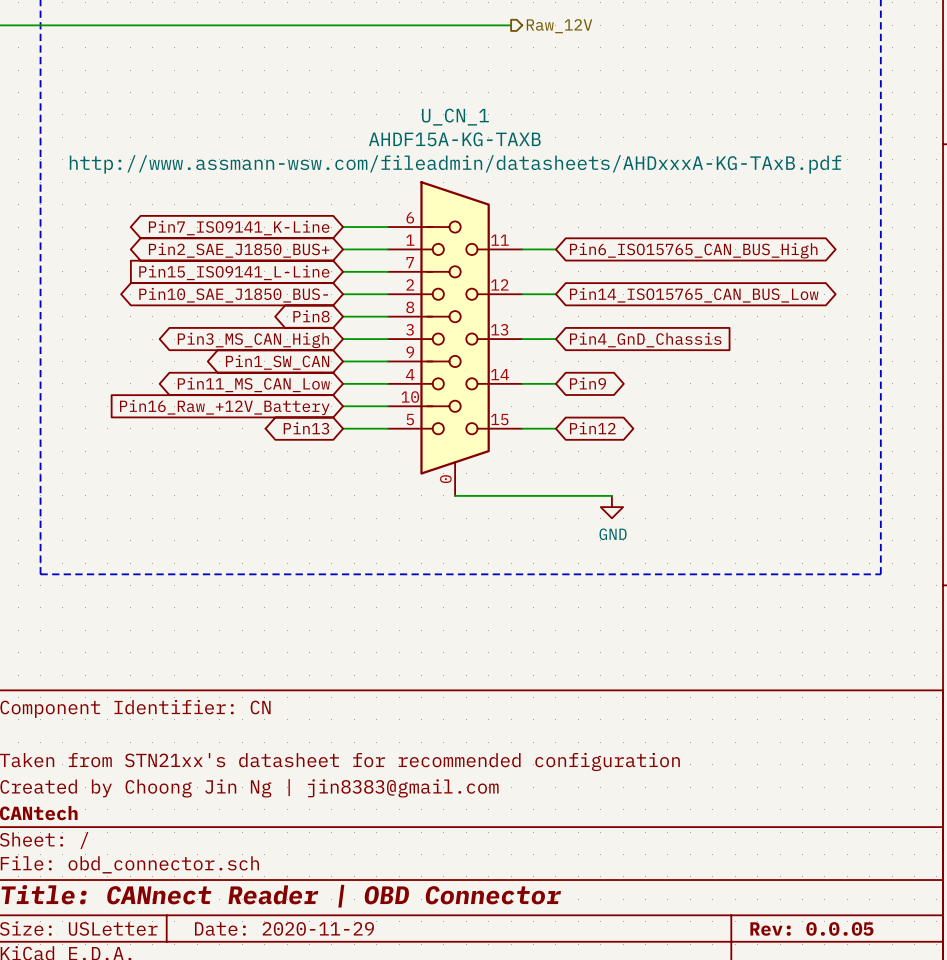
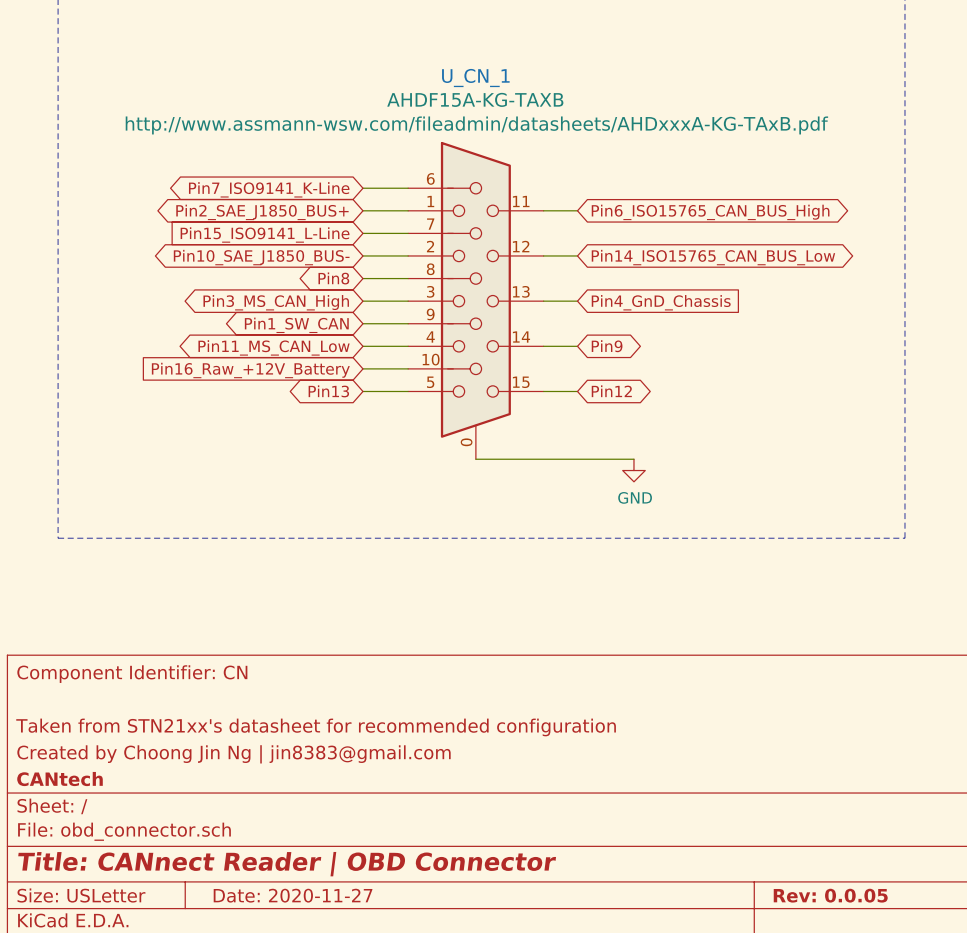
title block: Date: 2020-11-29 (284, 928) -> Date: 2020-11-27 (293, 895)

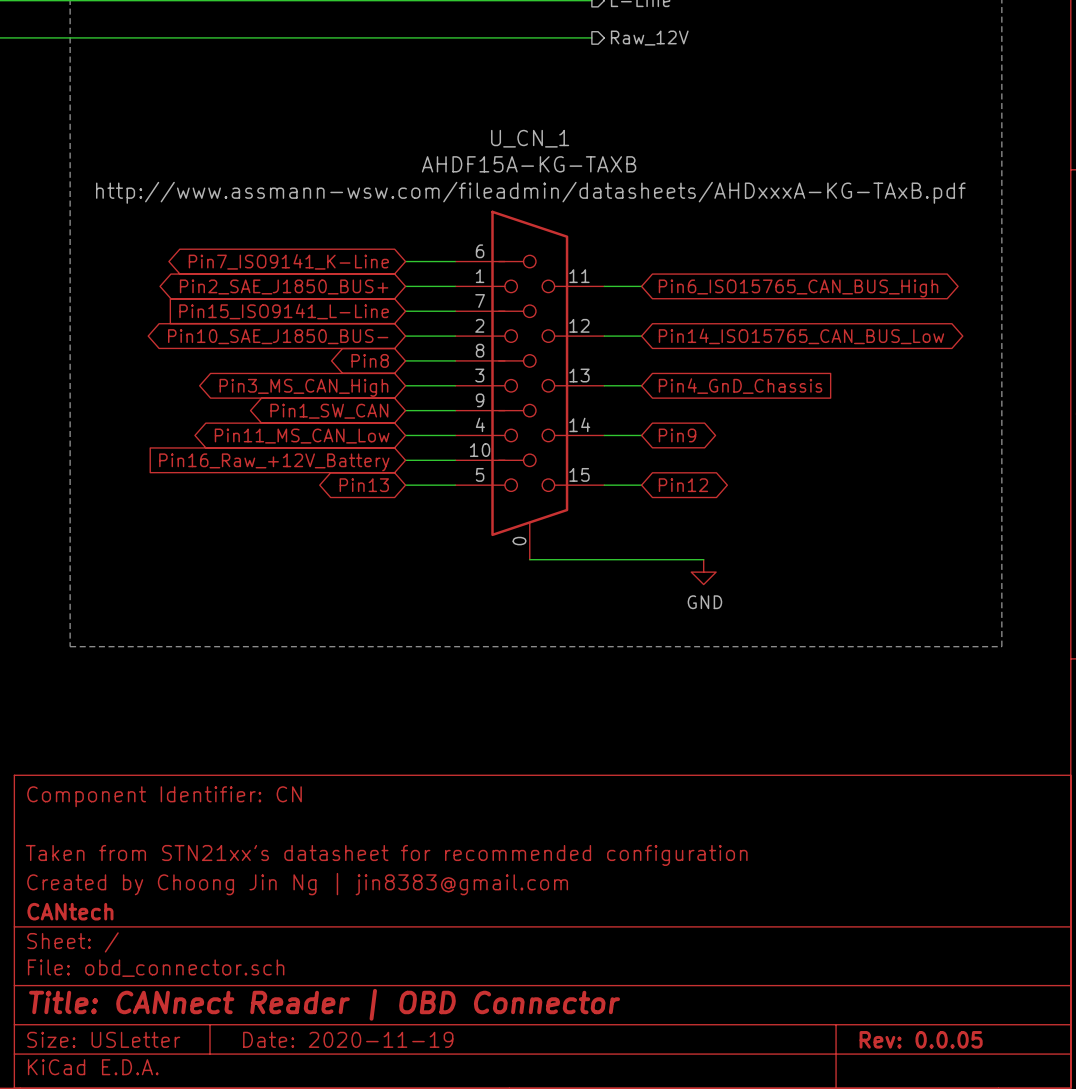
title block: Date: 2020-11-27 (293, 895) -> Date: 2020-11-19 (348, 1039)

